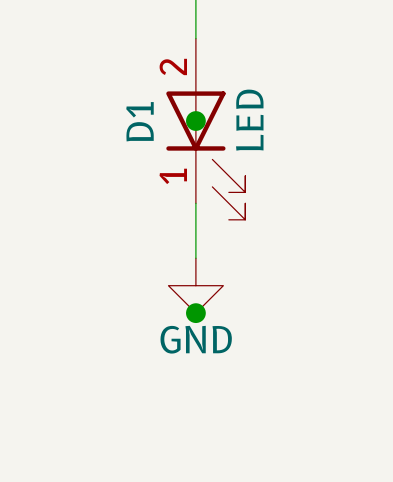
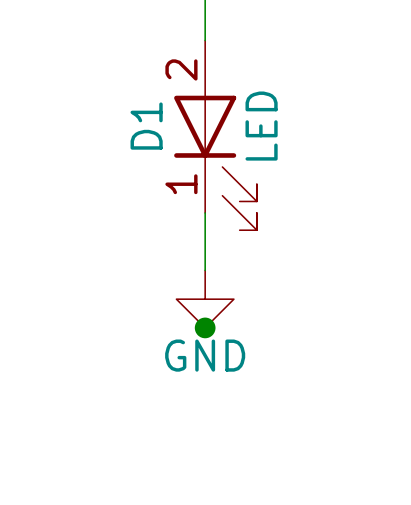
junction: (195, 121) -> none

